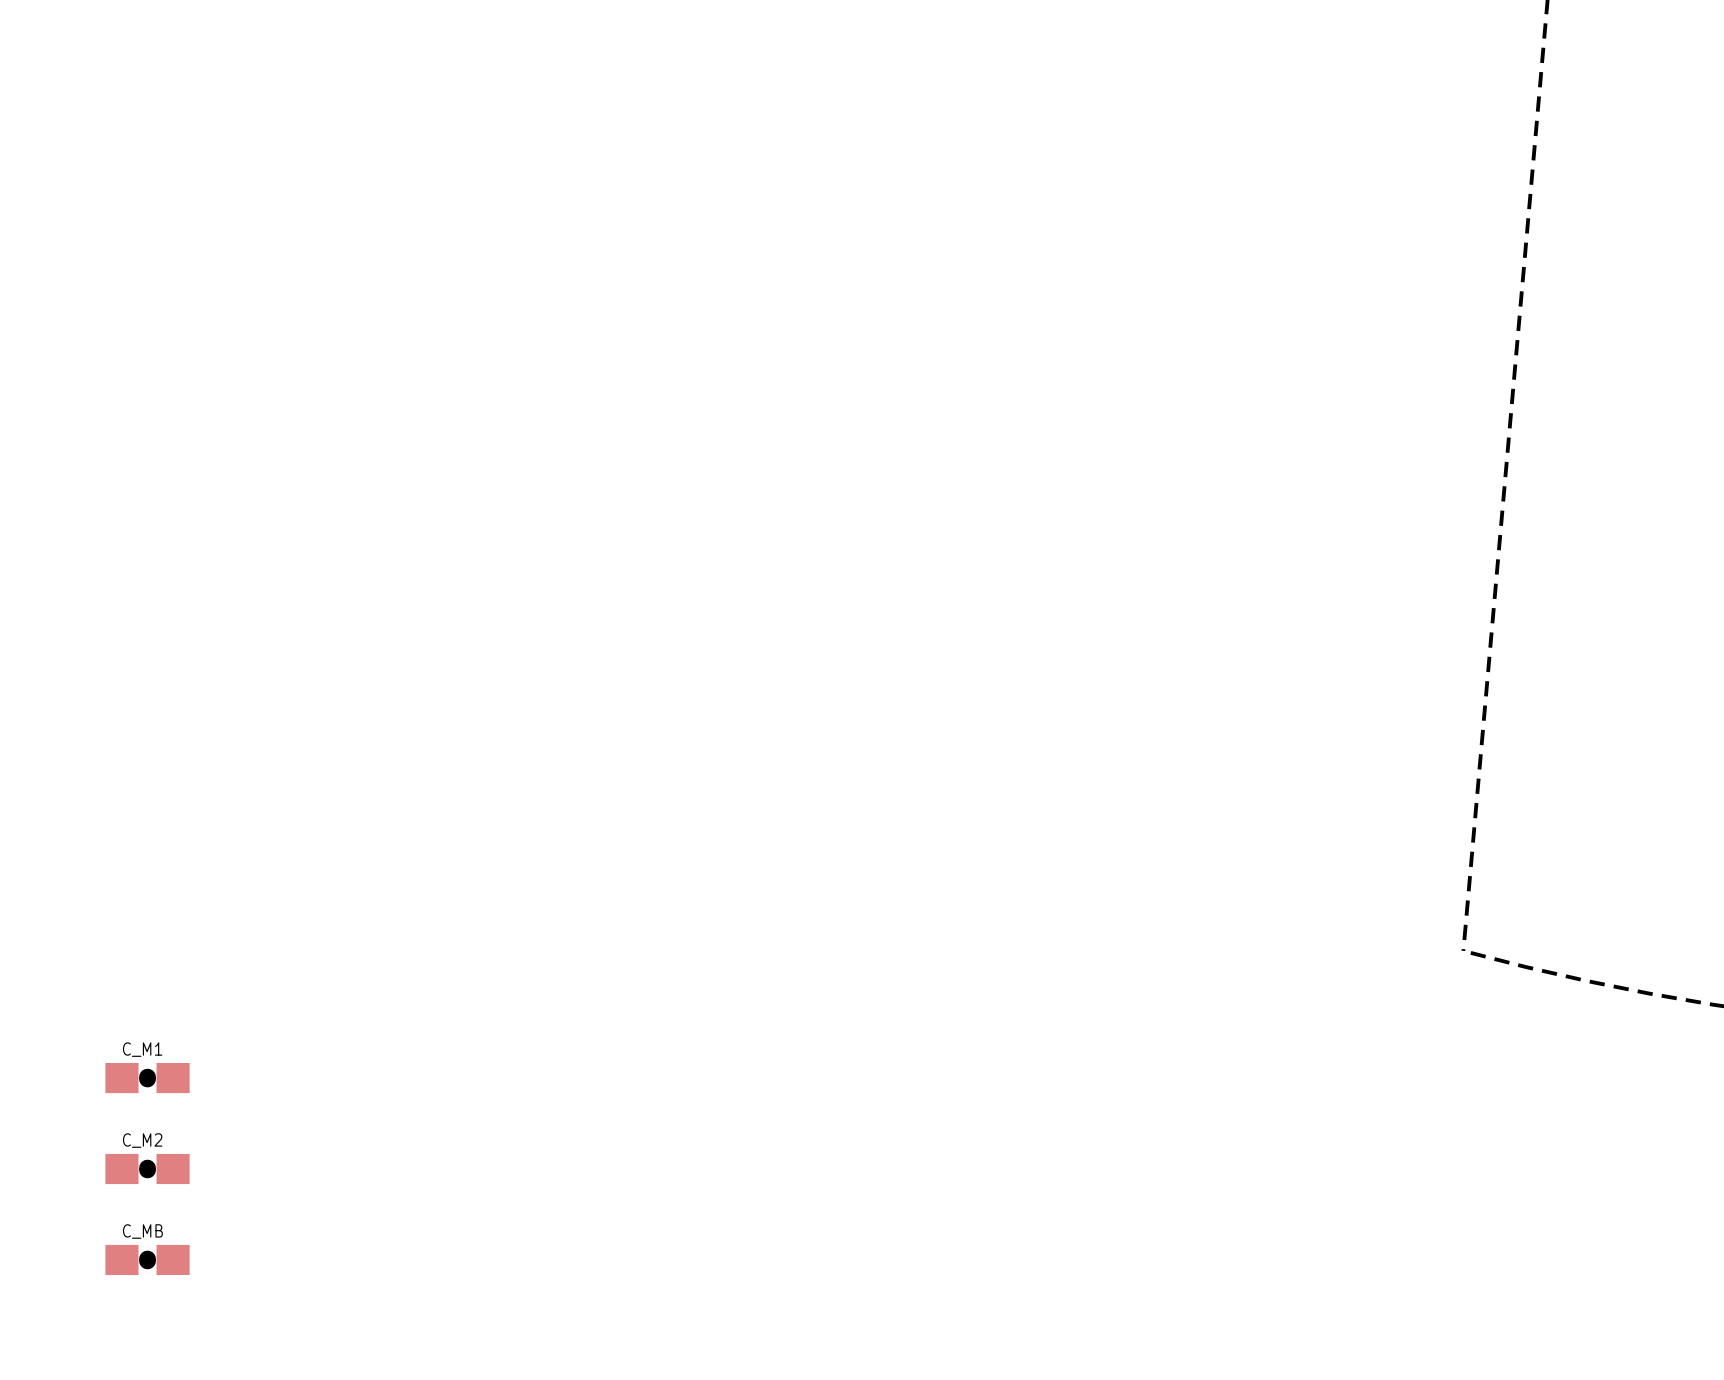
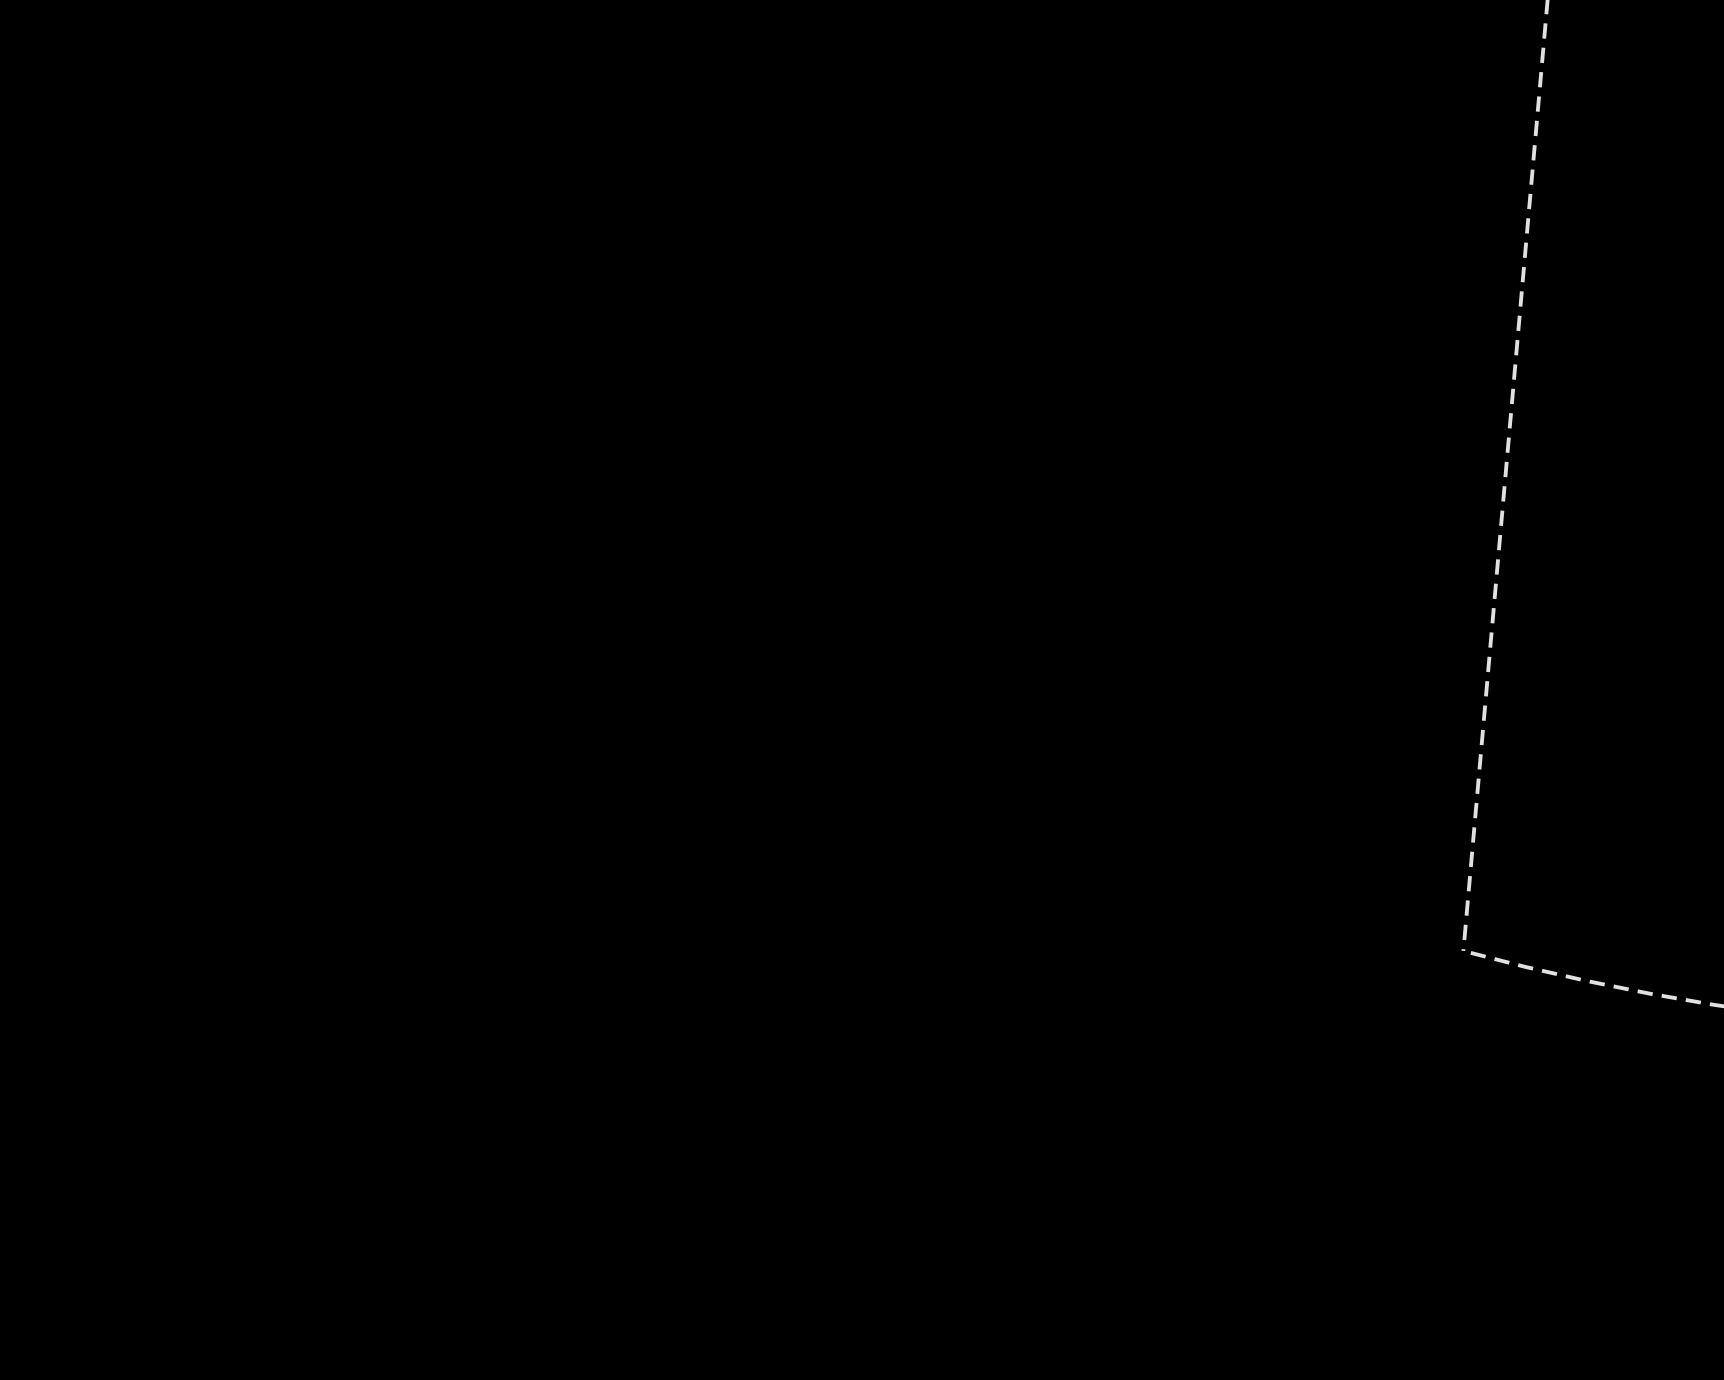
C_M1: (147, 1078) -> none
C_M2: (147, 1169) -> none
C_MB: (147, 1259) -> none

